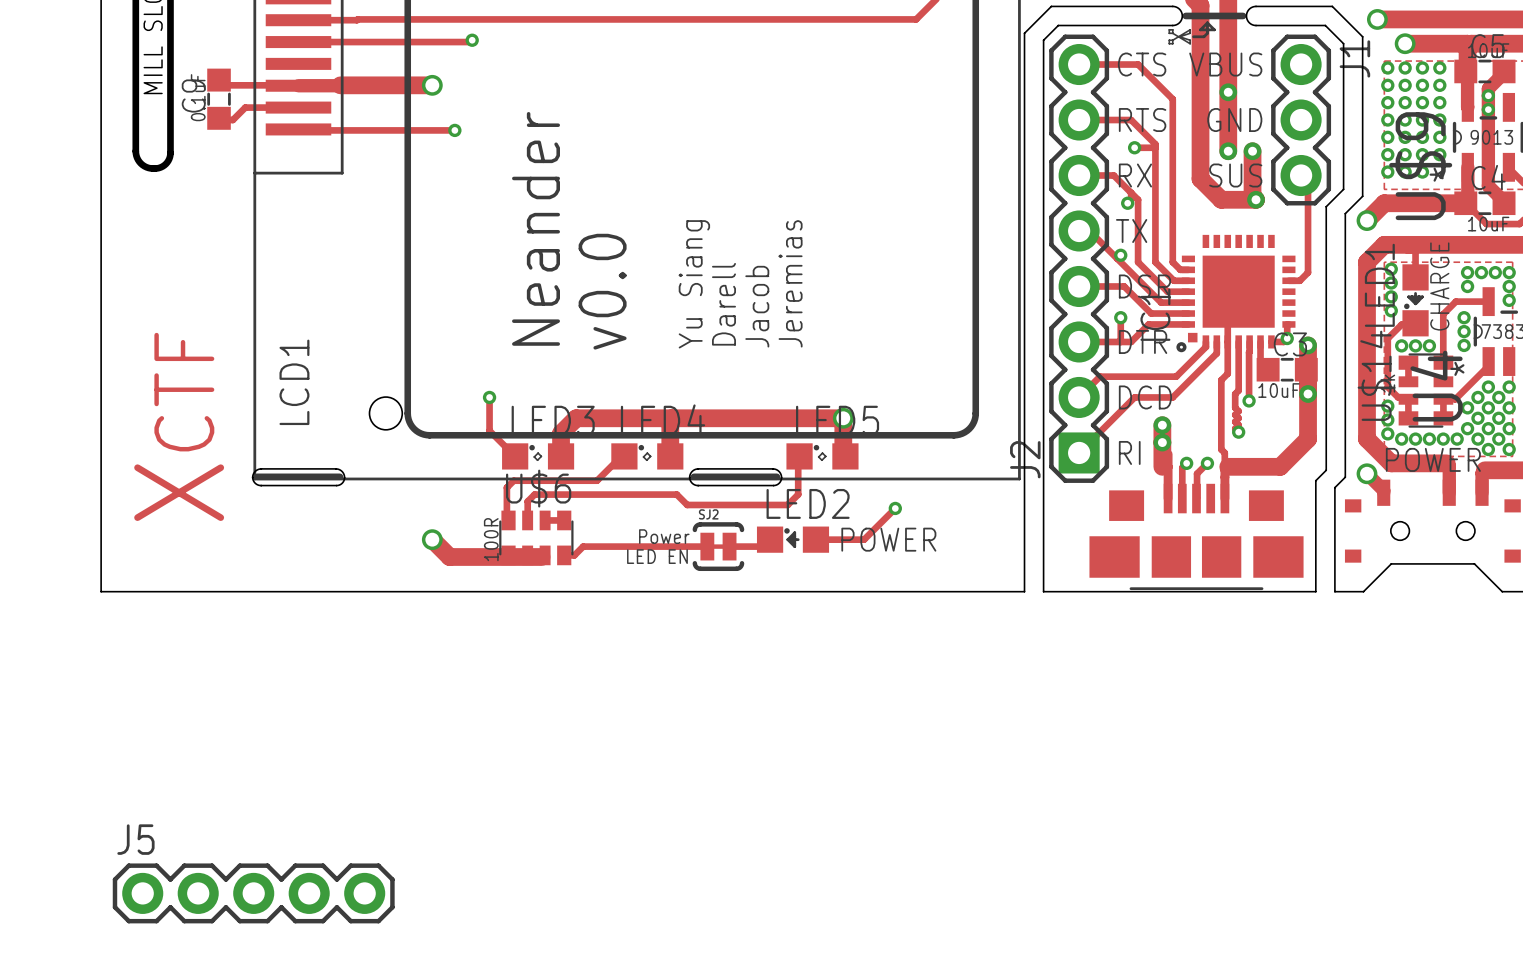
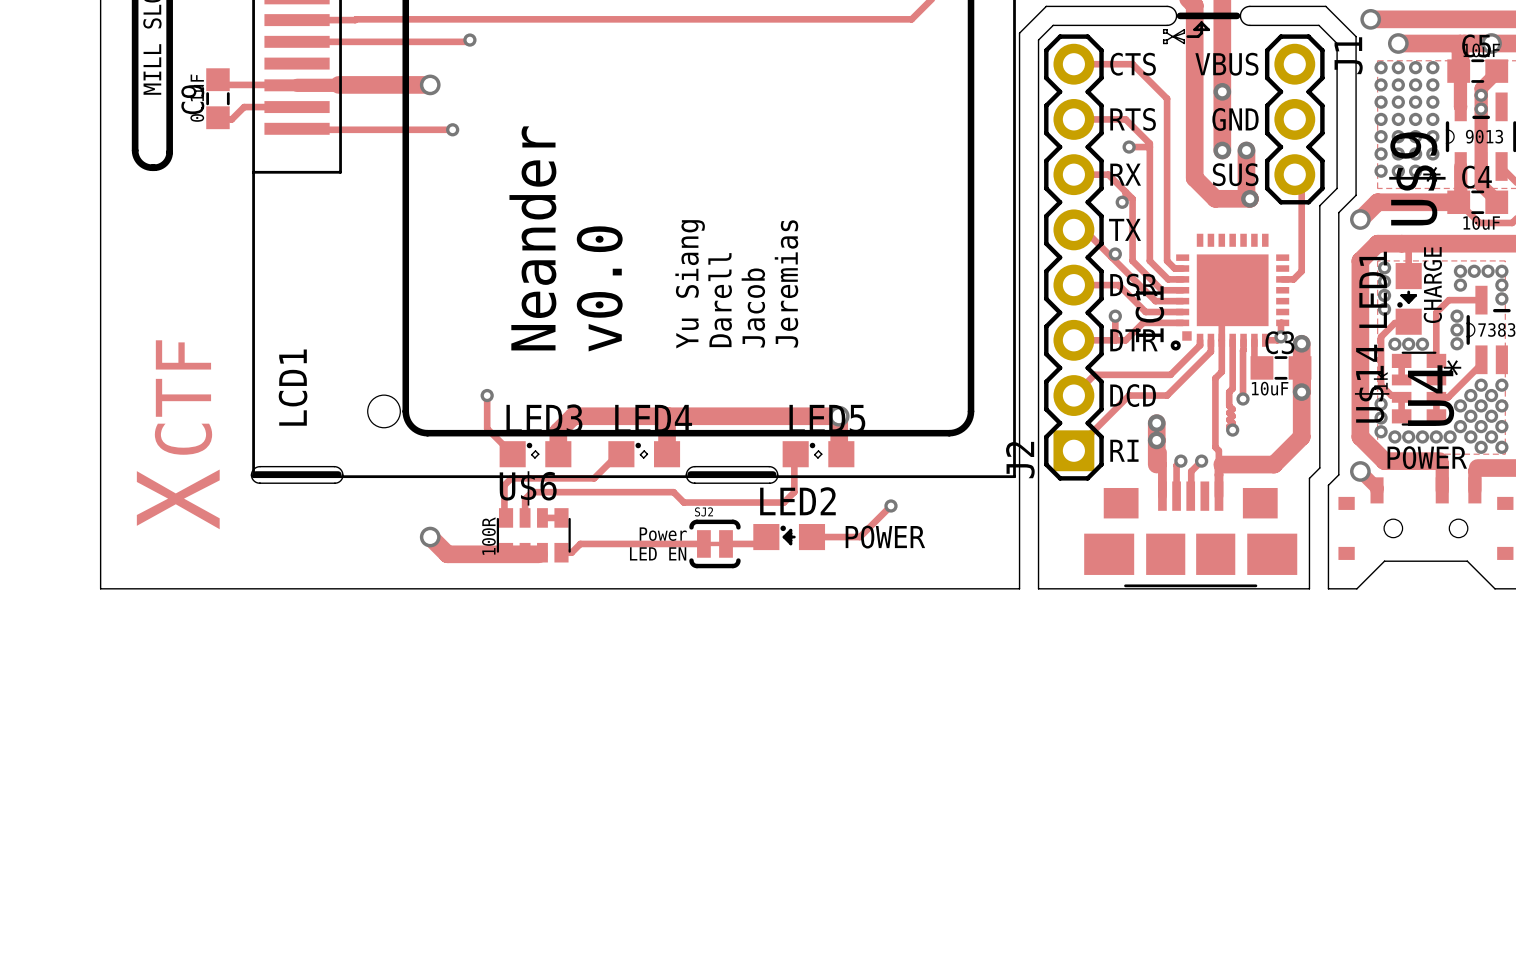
via: none -> (1491, 43)
J5: (253, 893) -> none

